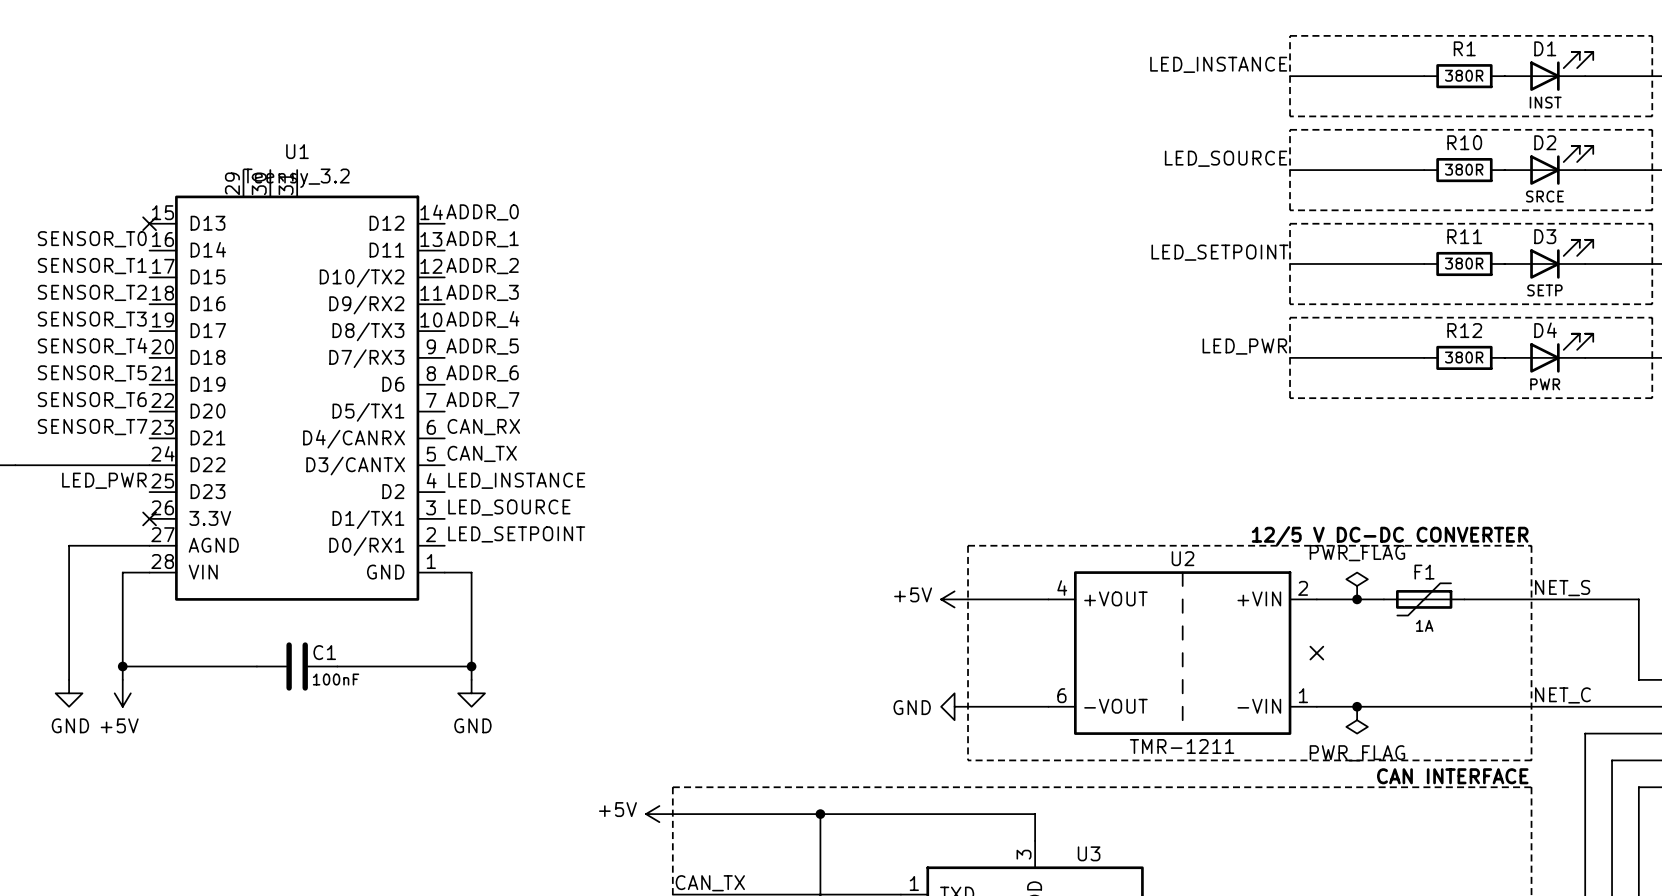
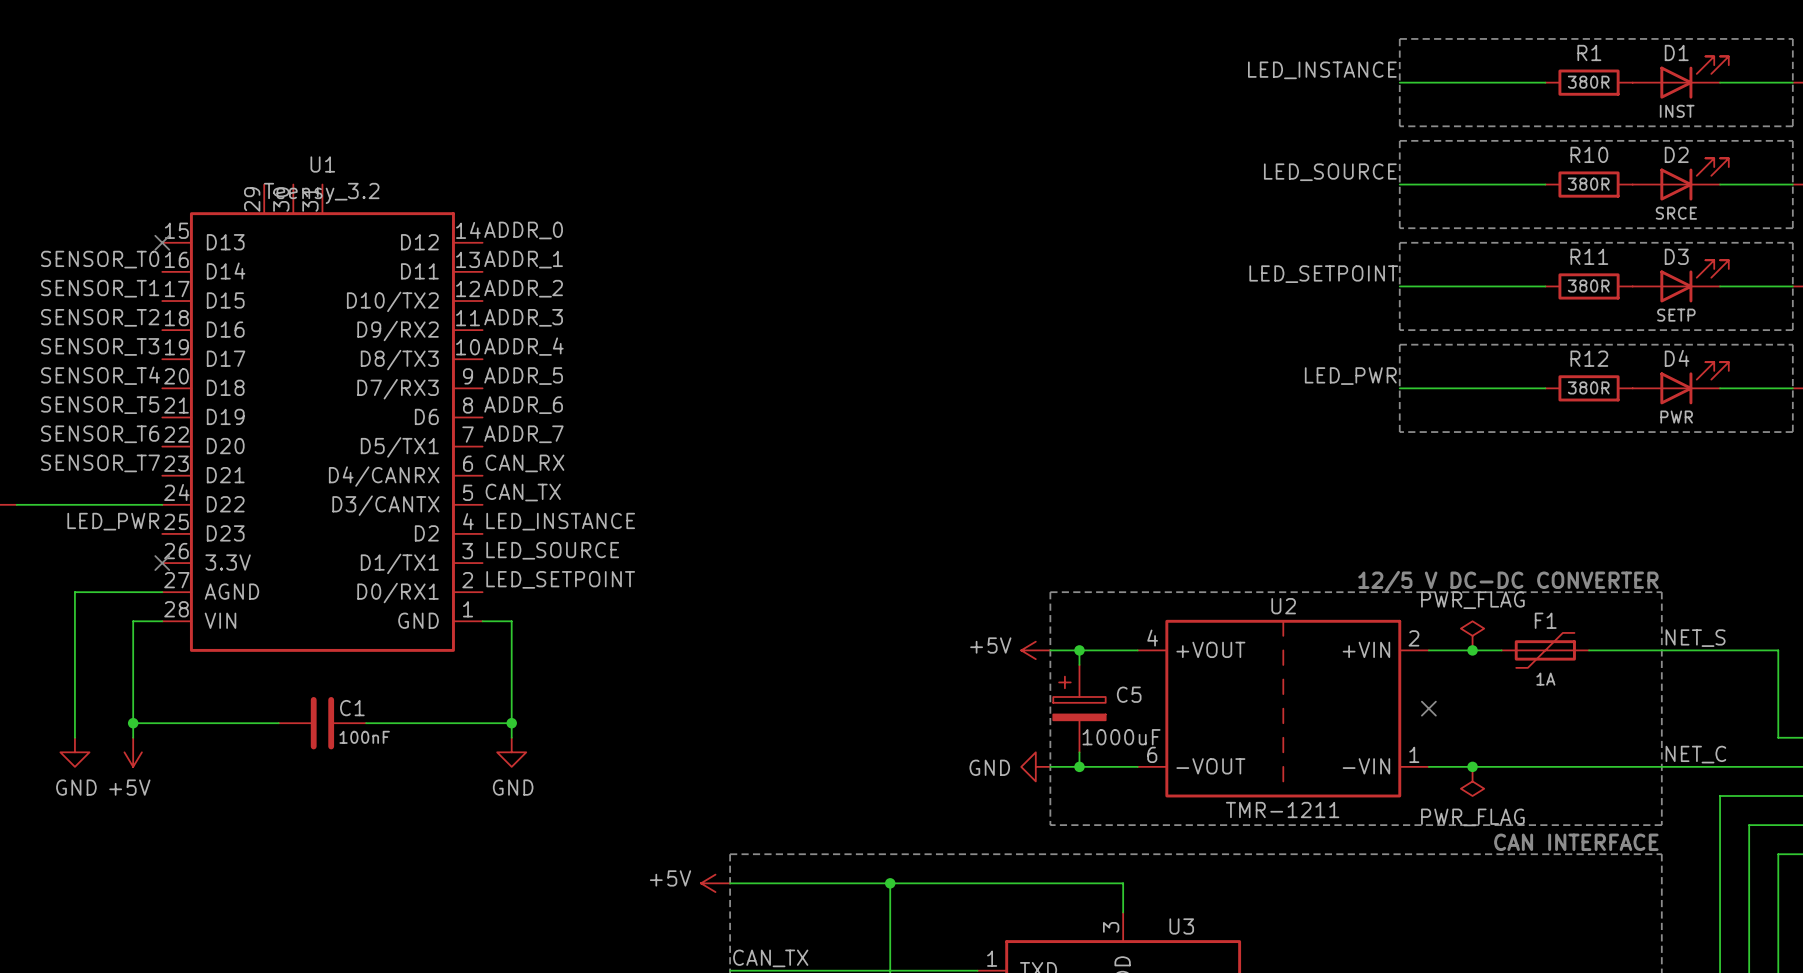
wire: none -> (1079, 650) (1079, 664)
junction: none -> (1079, 650)
C5: none -> 1000uF (1079, 708)
wire: none -> (1079, 752) (1079, 766)
junction: none -> (1079, 766)

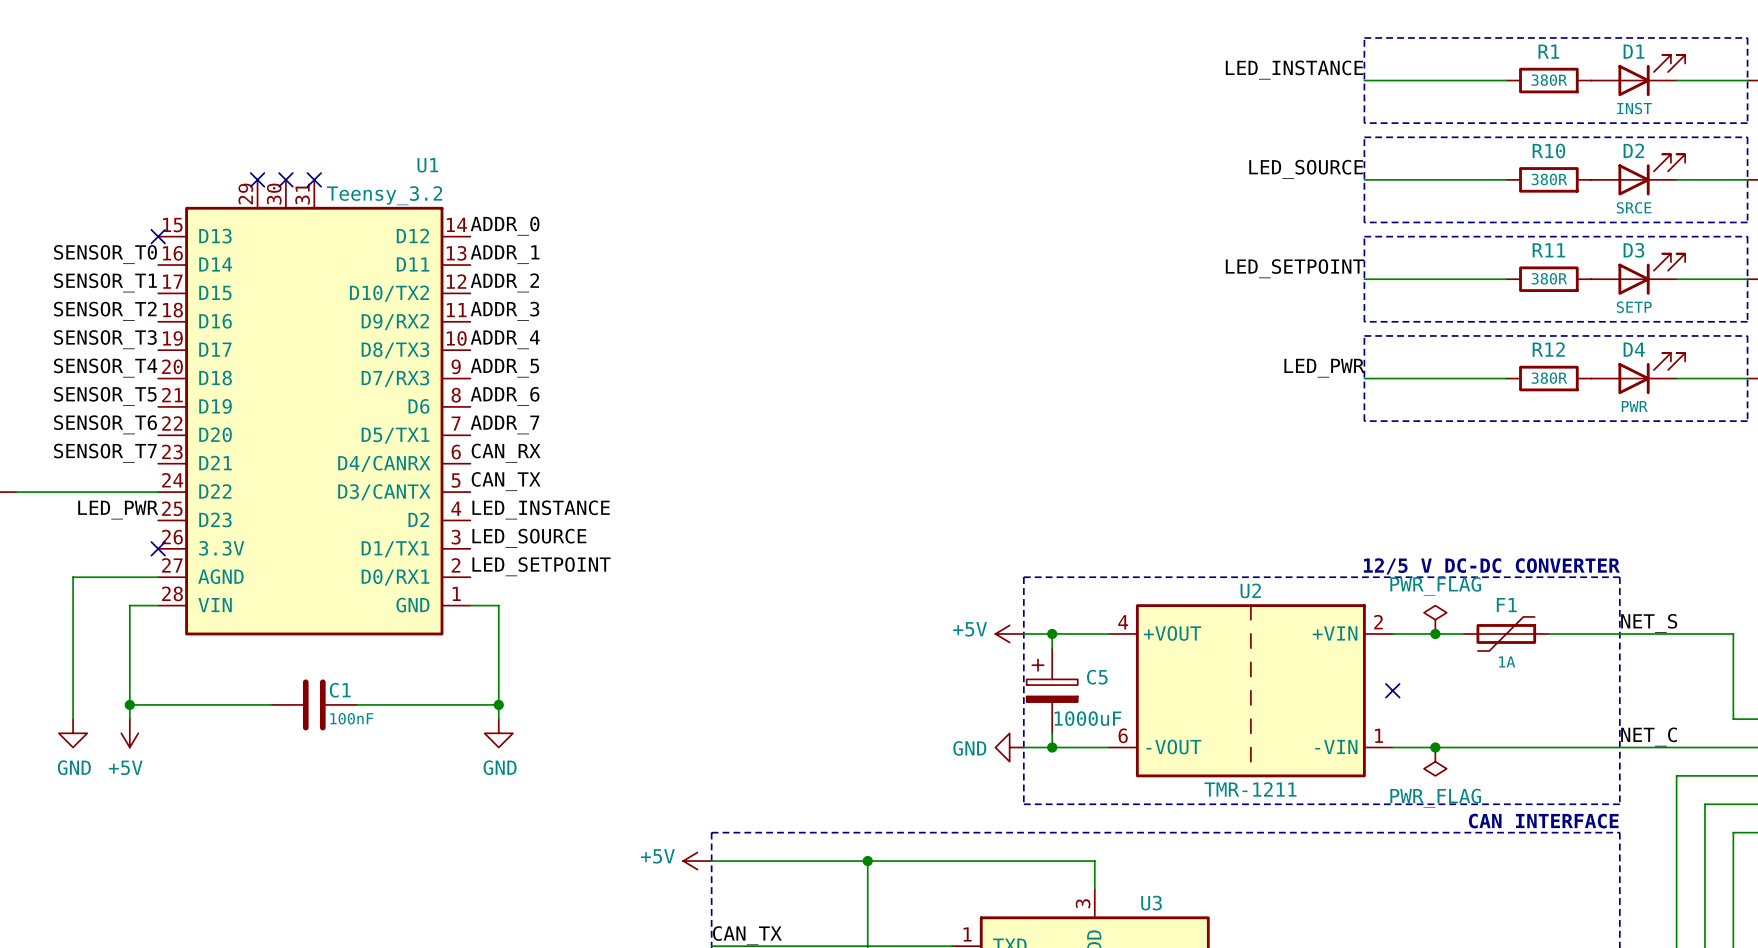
U1 name position: U1 (322, 164) -> U1 (427, 165)
no-connect mark: none -> (257, 179)
no-connect mark: none -> (285, 179)
no-connect mark: none -> (314, 179)
U1 value position: Teensy_3.2 (321, 193) -> Teensy_3.2 (384, 195)

